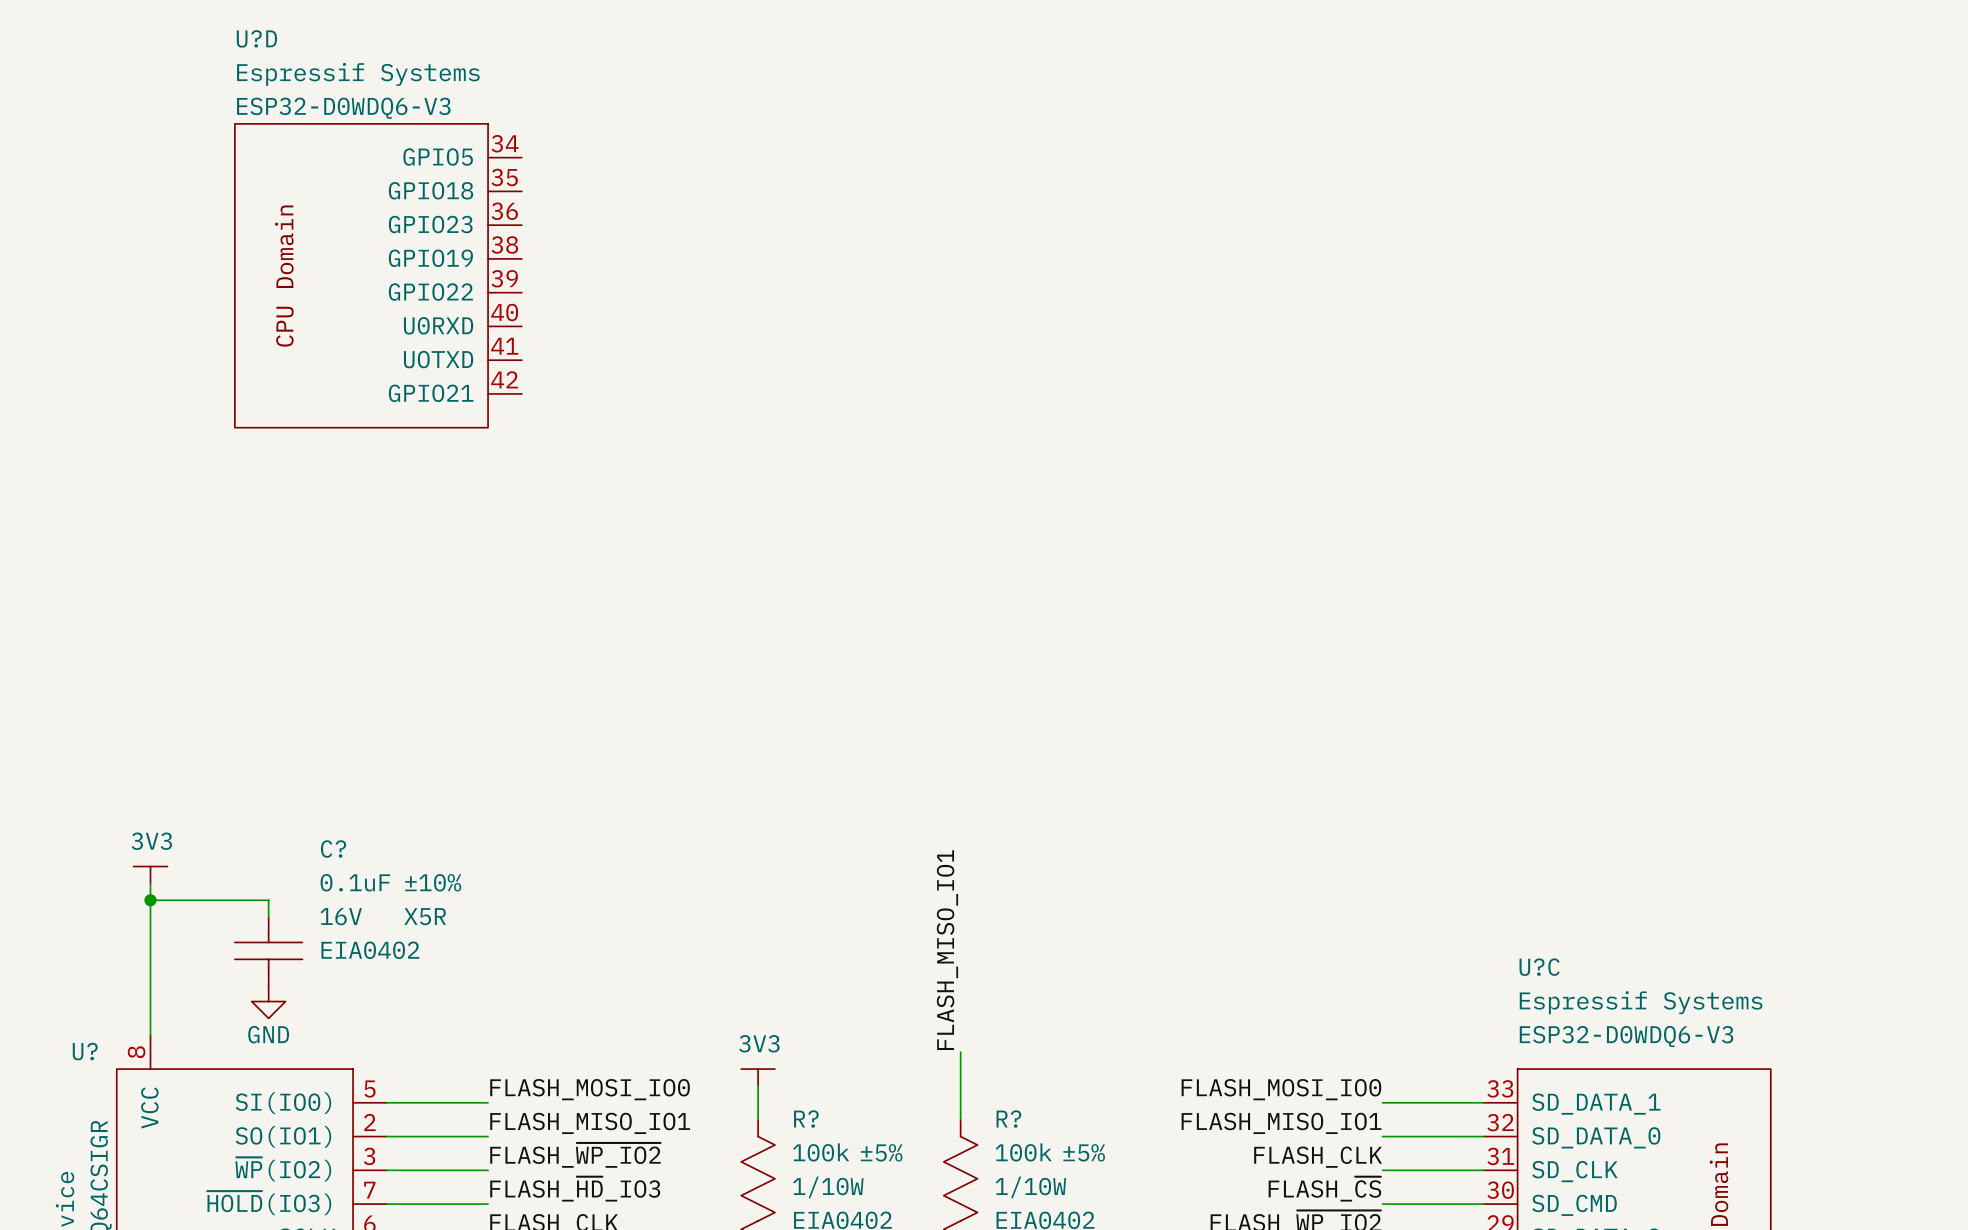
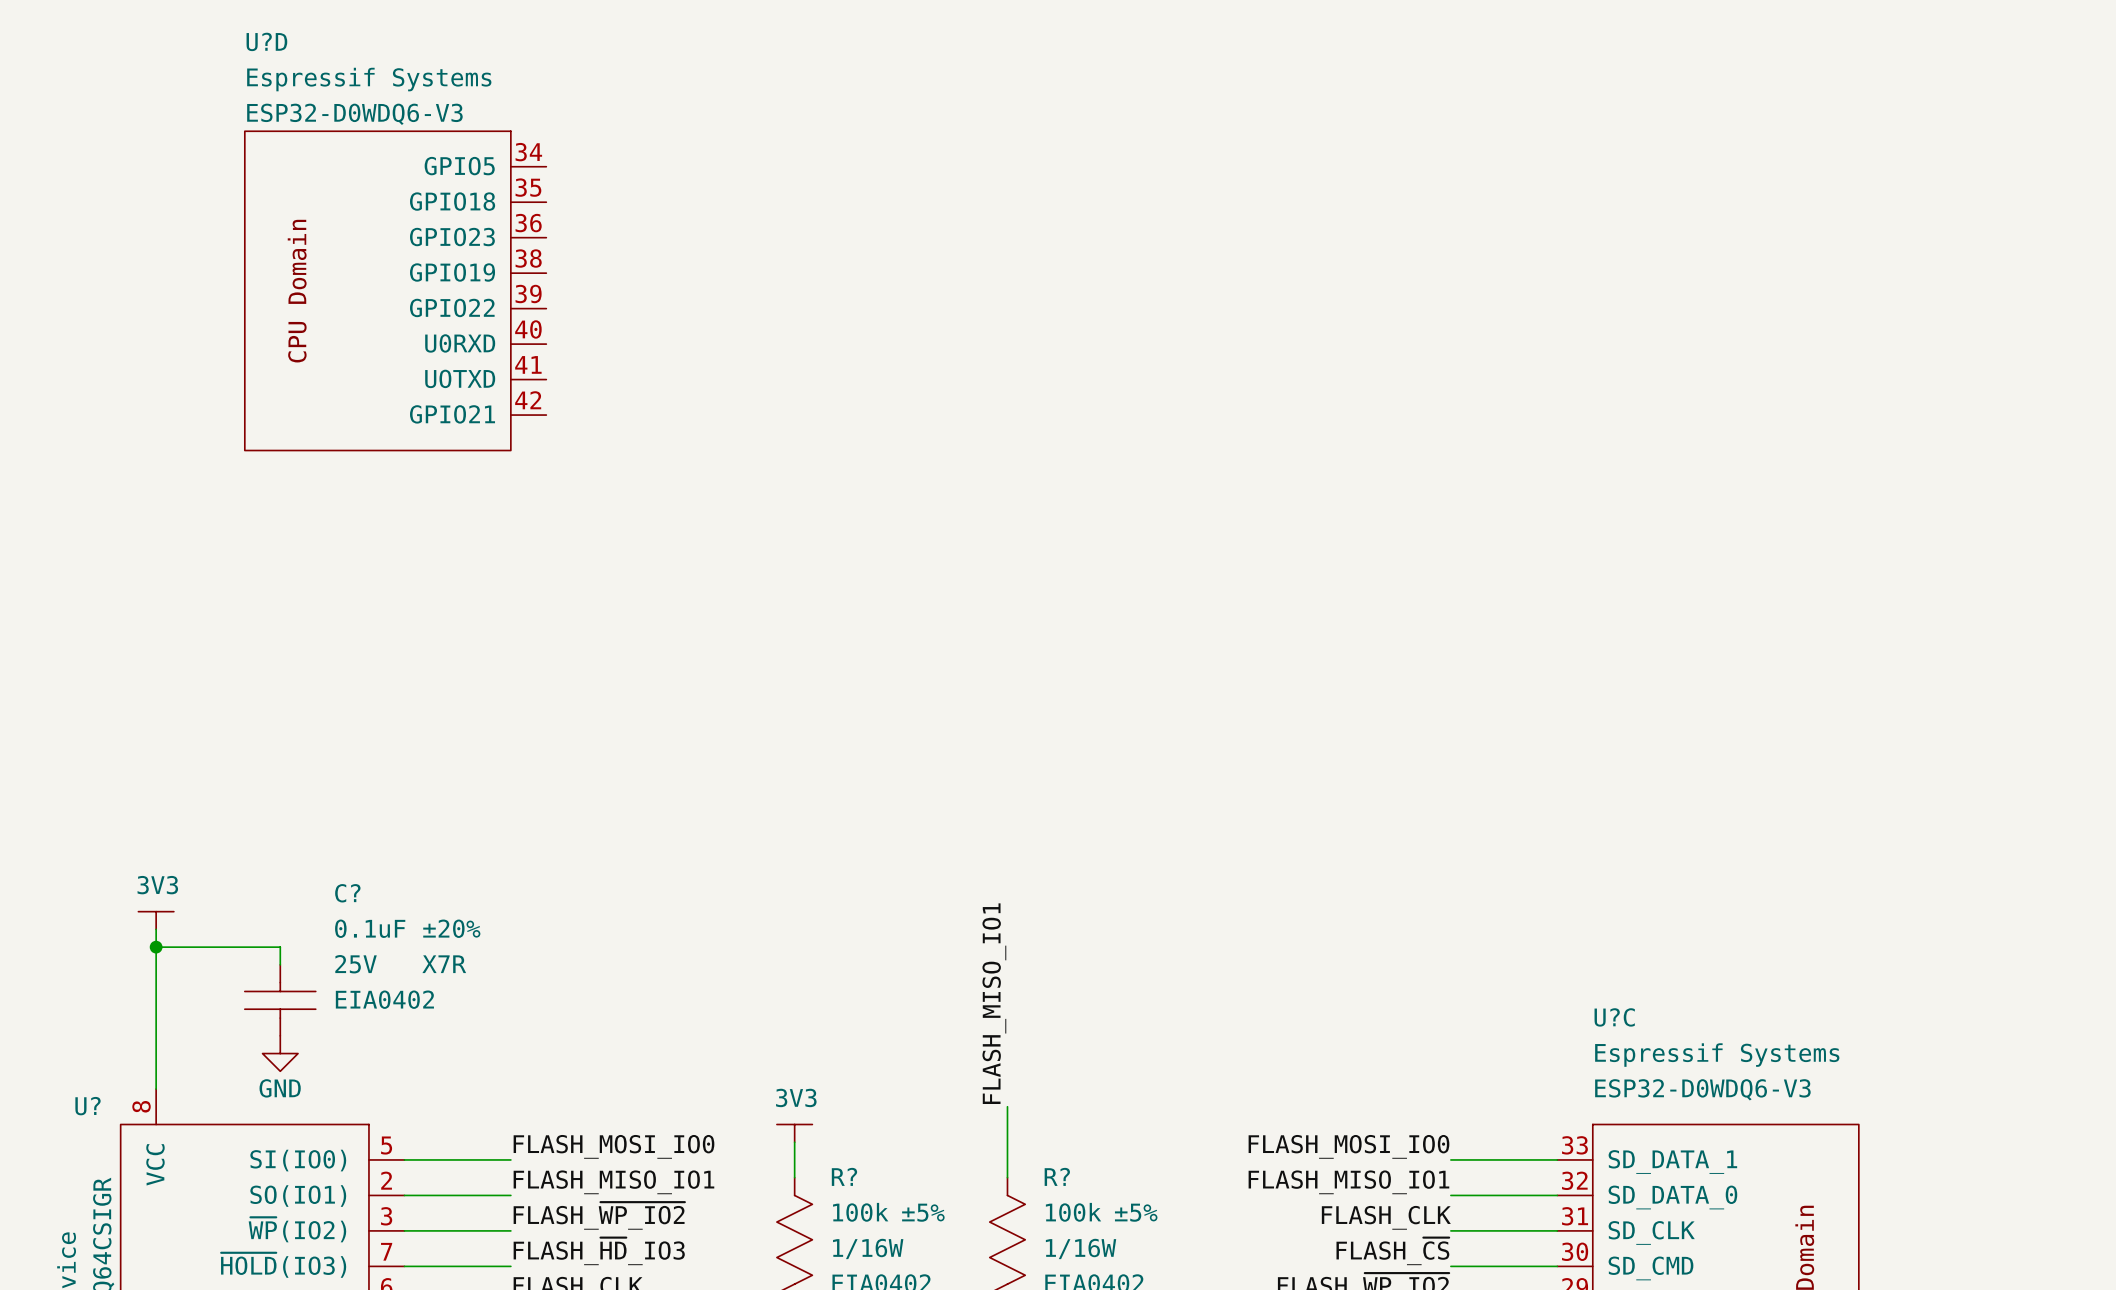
C? text: ±10% (433, 882) -> ±20% (451, 928)
C? text: 16V (341, 916) -> 25V (356, 964)
C? text: X5R (425, 916) -> X7R (444, 964)
R? text: 1/10W (828, 1187) -> 1/16W (868, 1248)
R? text: 1/10W (1030, 1187) -> 1/16W (1081, 1248)

